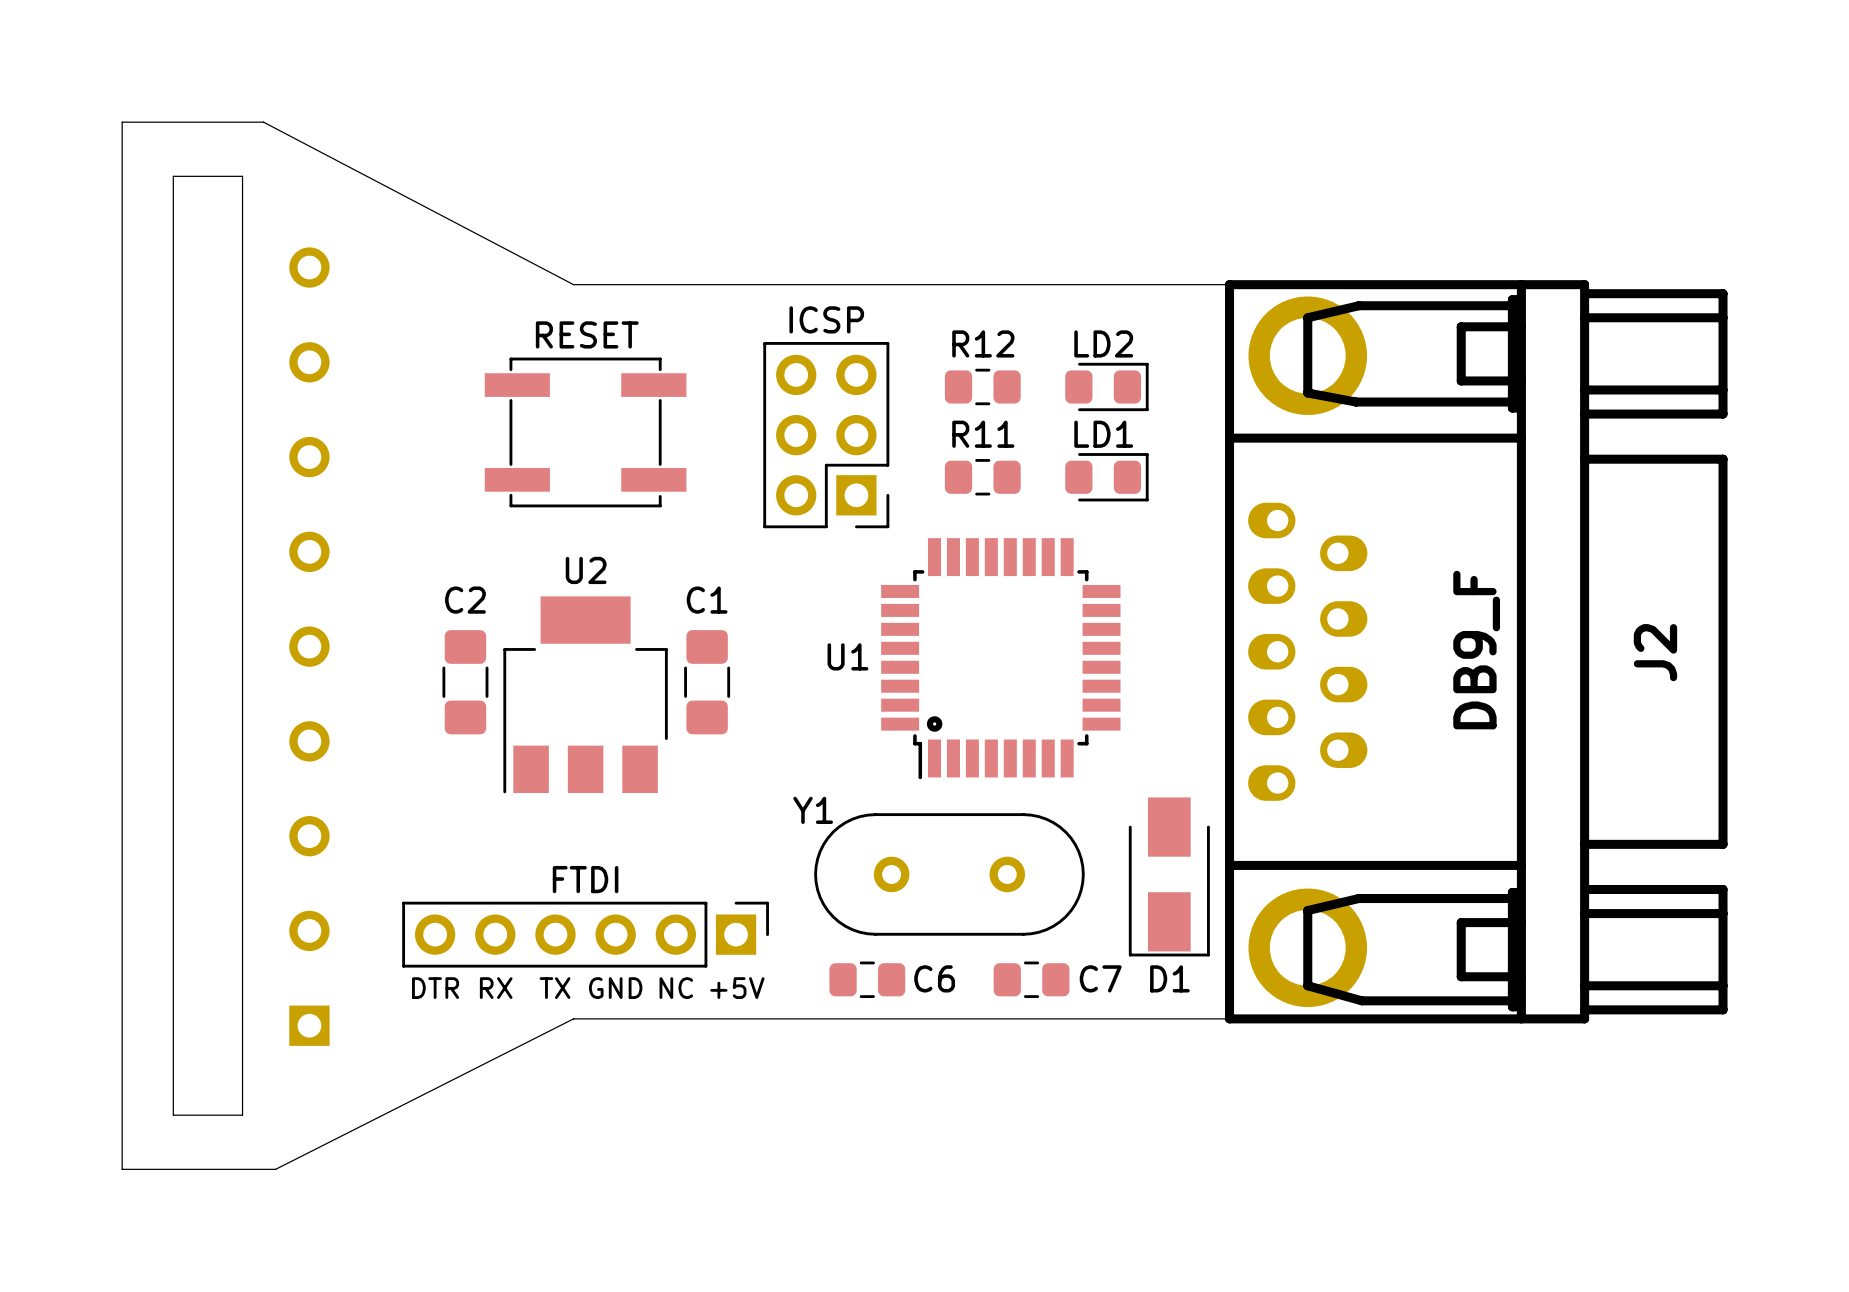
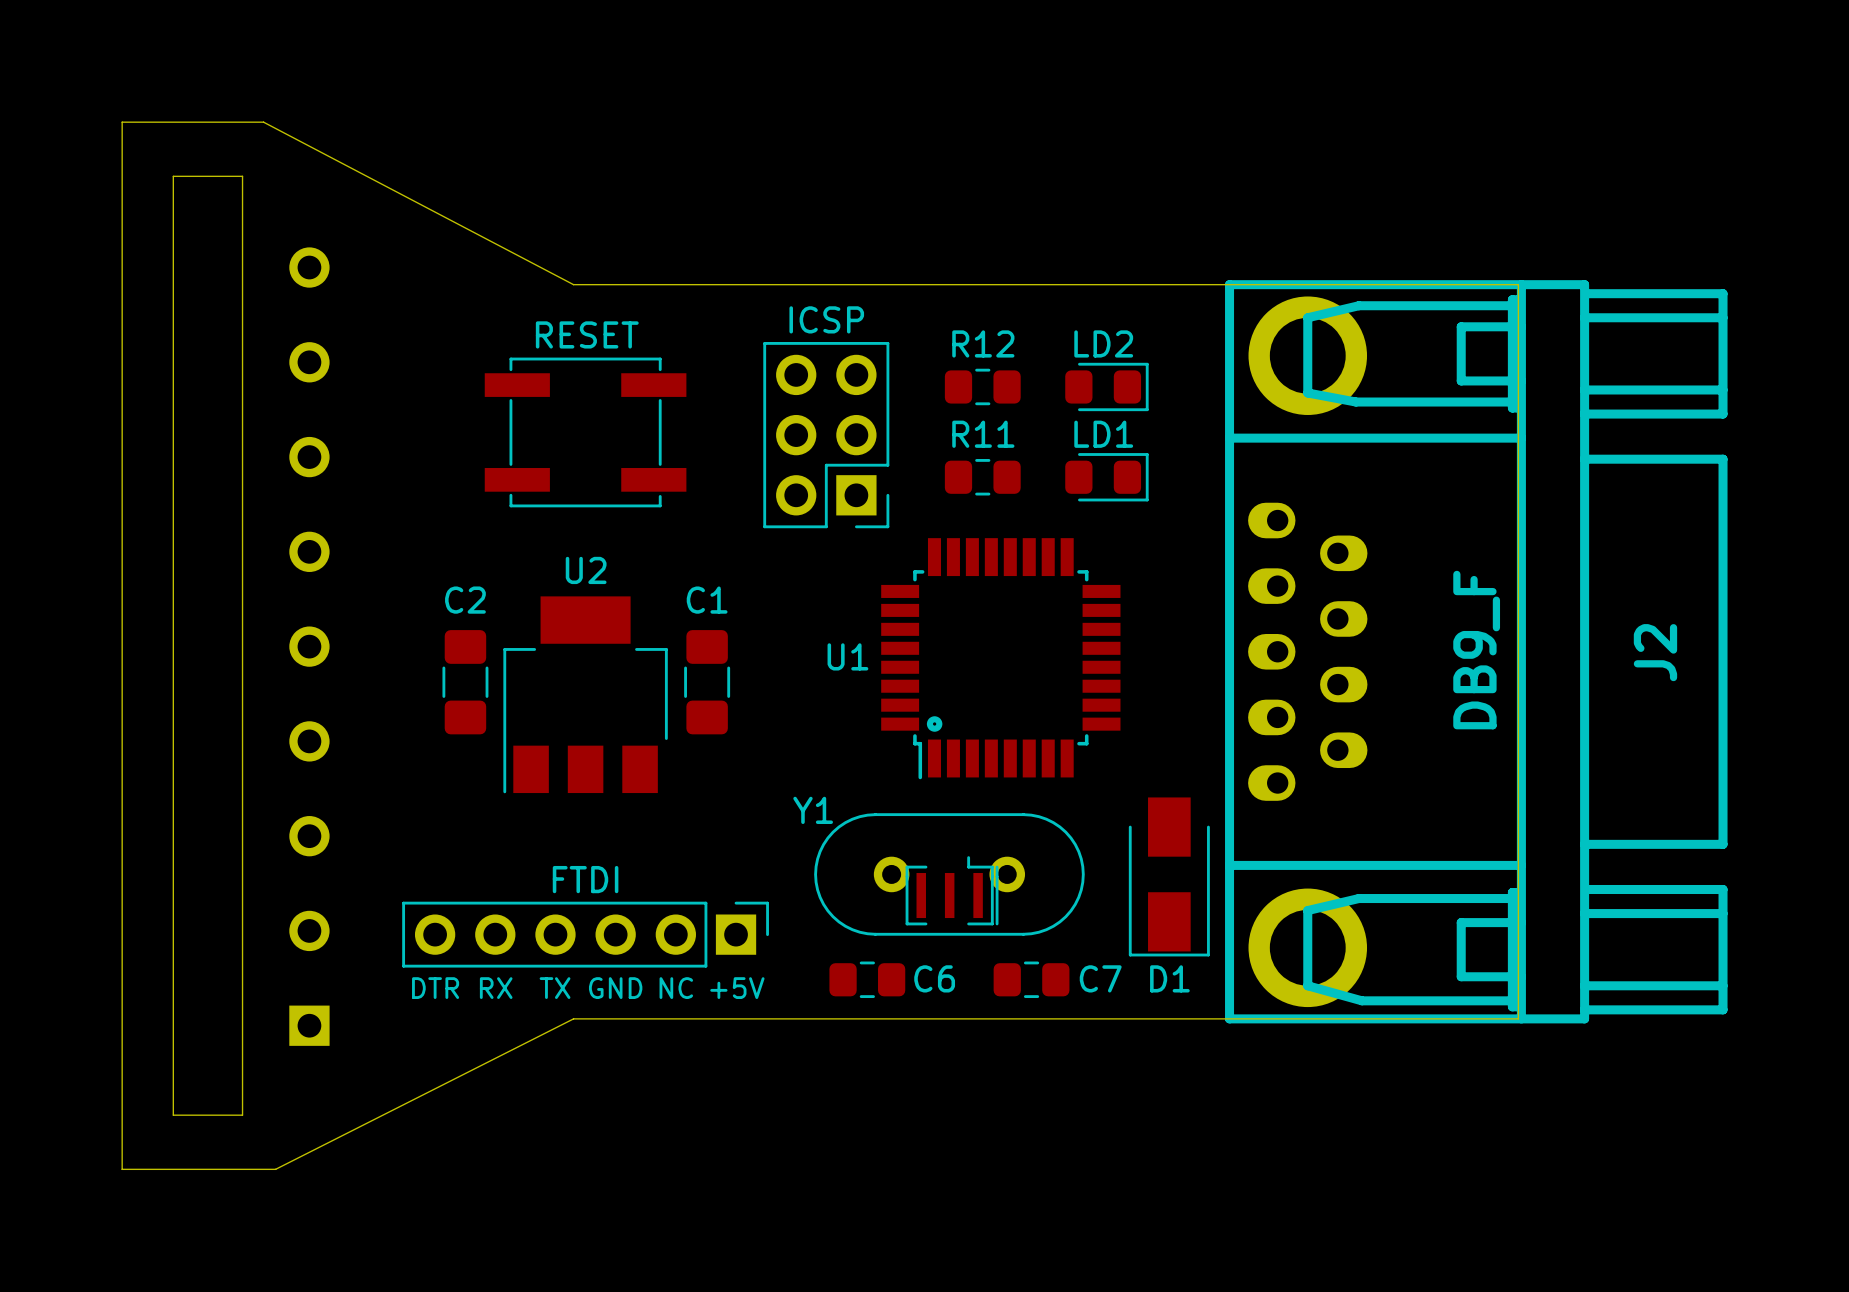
part: none -> (952, 890)

